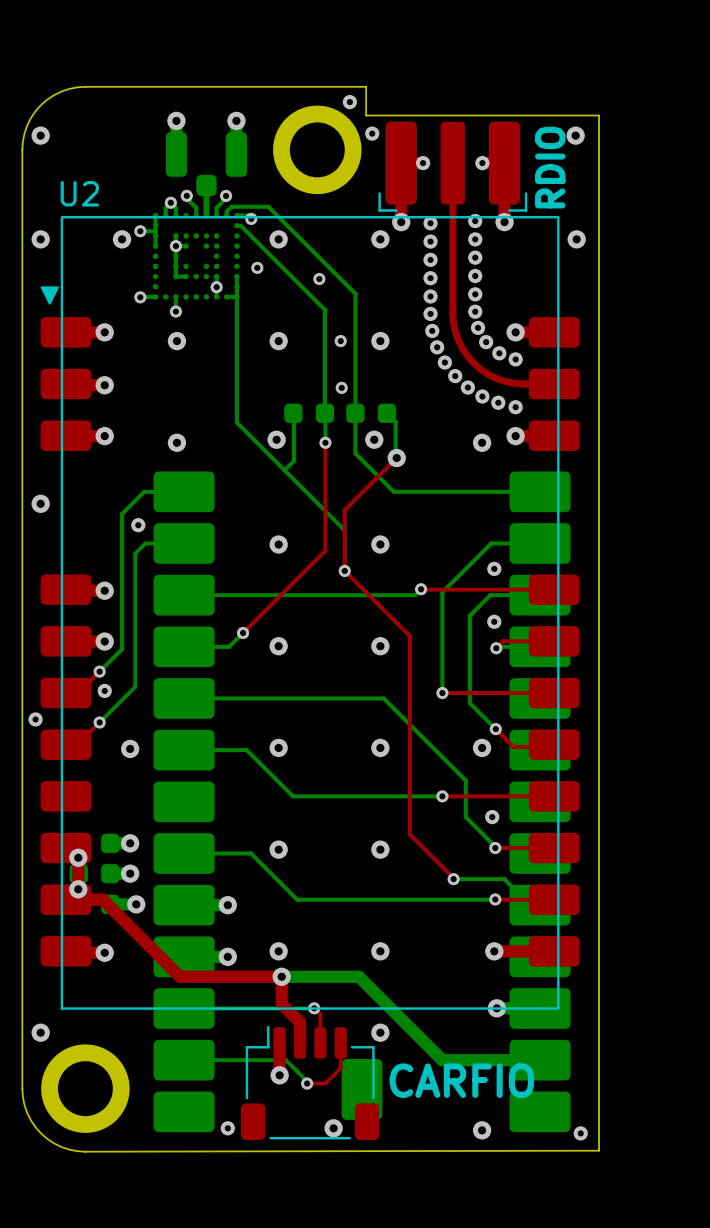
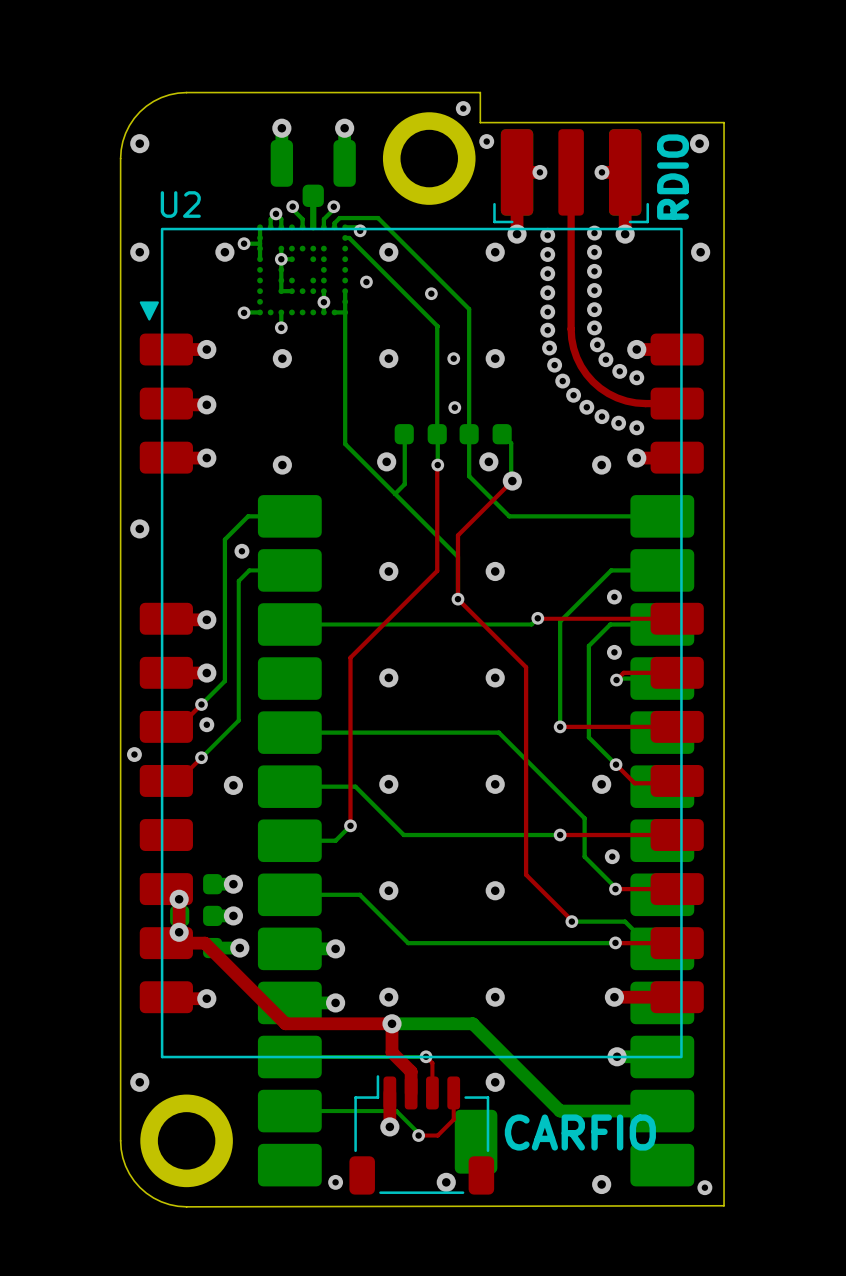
top track: (325, 442) (325, 550) (243, 632) -> (437, 465) (437, 570) (350, 657) (350, 825)
bottom track: (243, 632) (229, 646) (184, 646) -> none
via: (243, 632) -> none
bottom track: none -> (350, 825) (335, 840) (289, 840)
via: none -> (350, 825)

